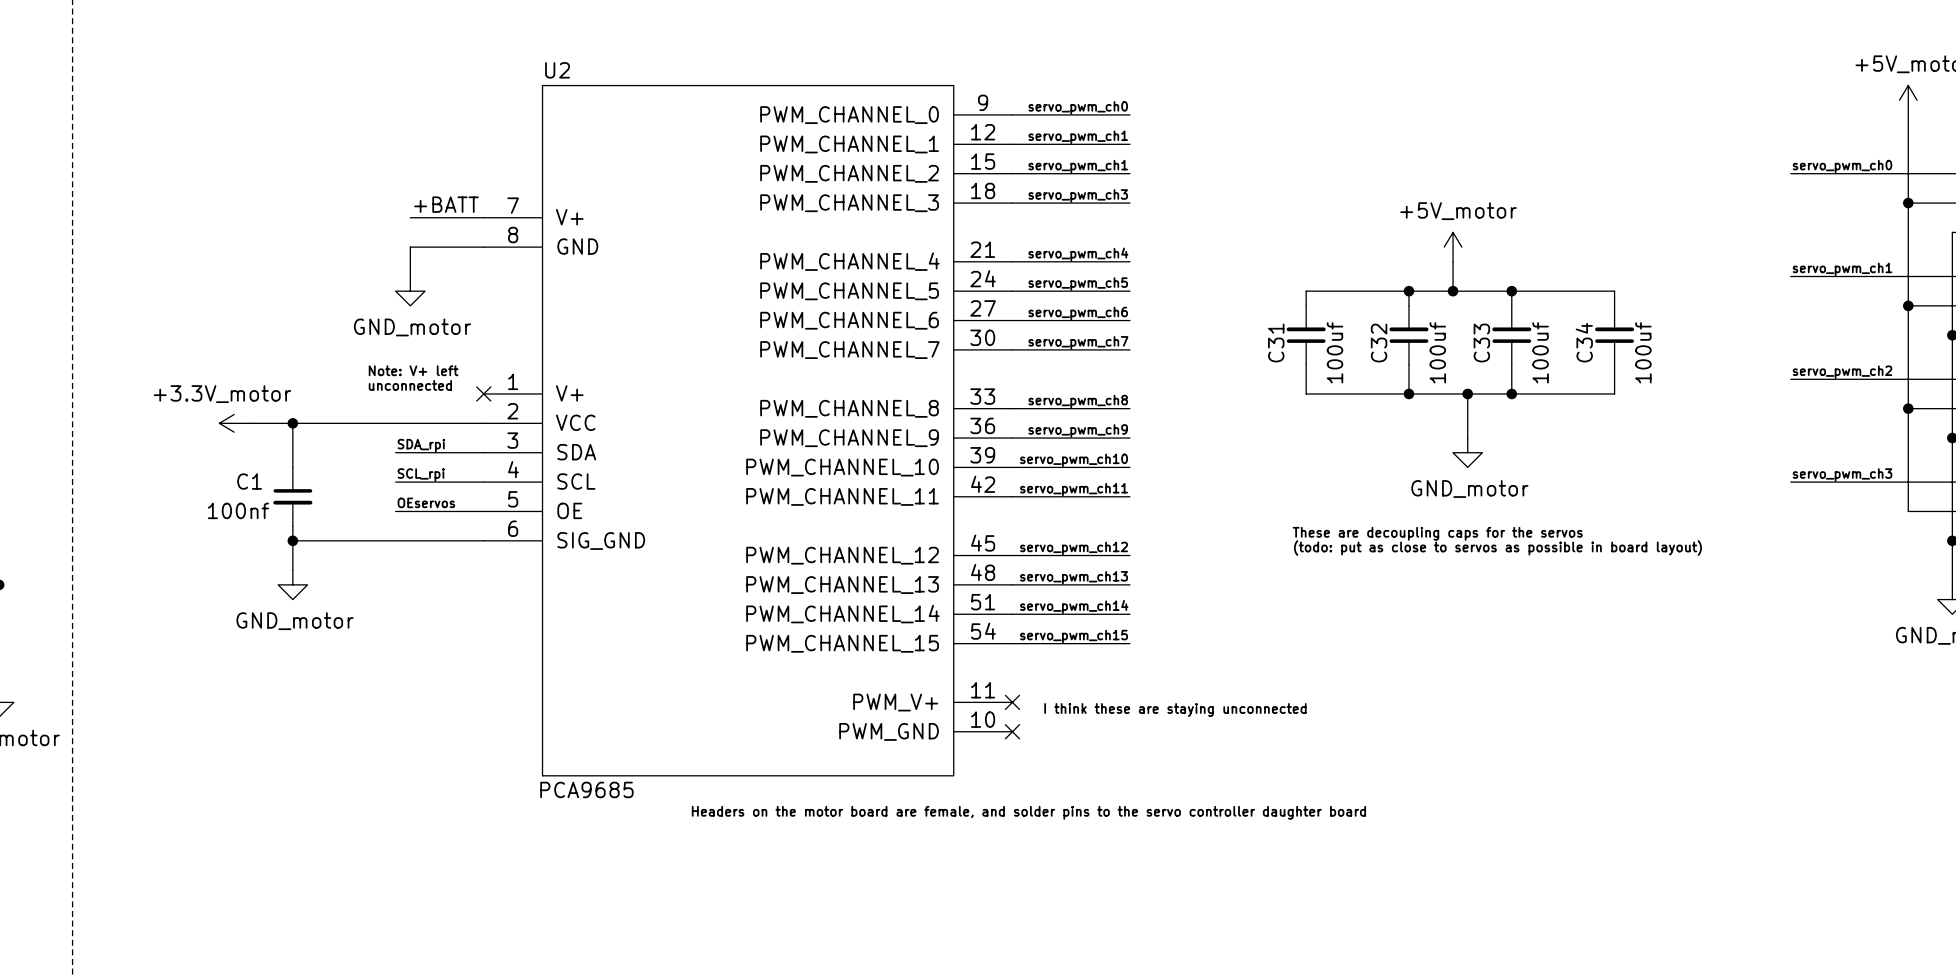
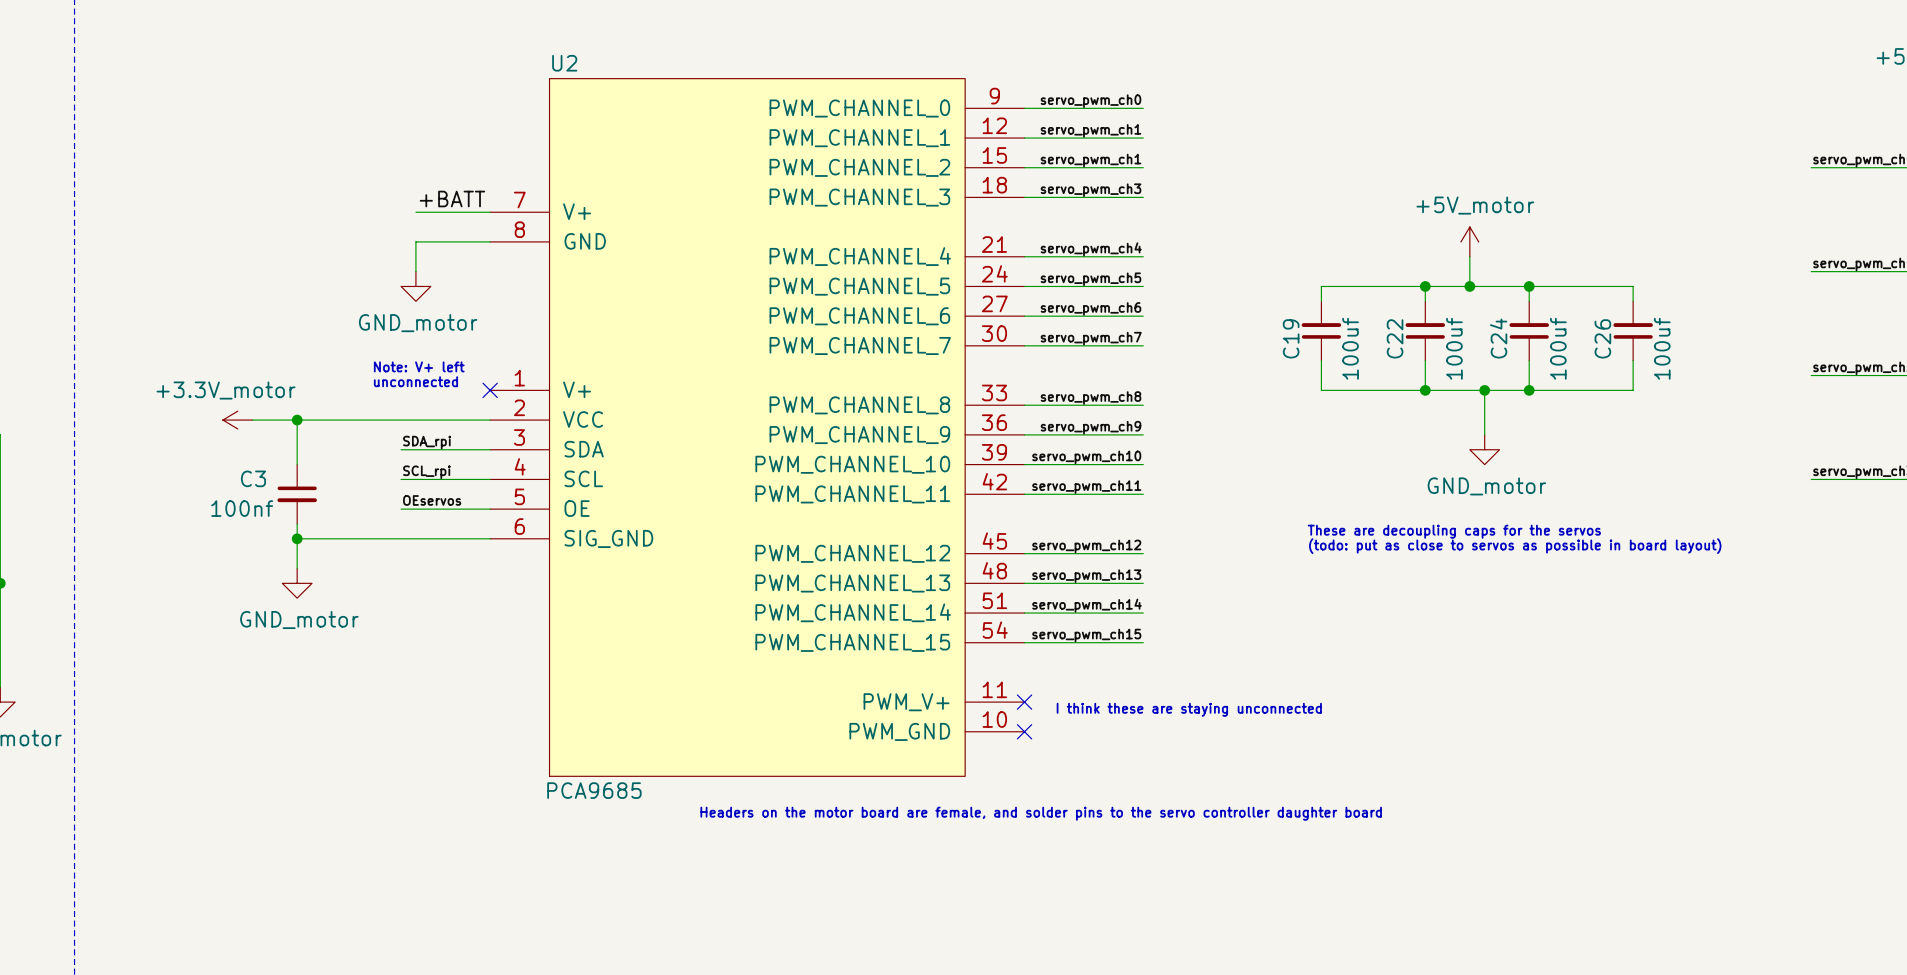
C34 name: C34 (1584, 342) -> C26 (1602, 338)
C31 name: C31 (1276, 343) -> C19 (1291, 338)
C32 name: C32 (1379, 343) -> C22 (1395, 338)
C33 name: C33 (1481, 343) -> C24 (1498, 338)
C1 name: C1 (249, 481) -> C3 (253, 478)

